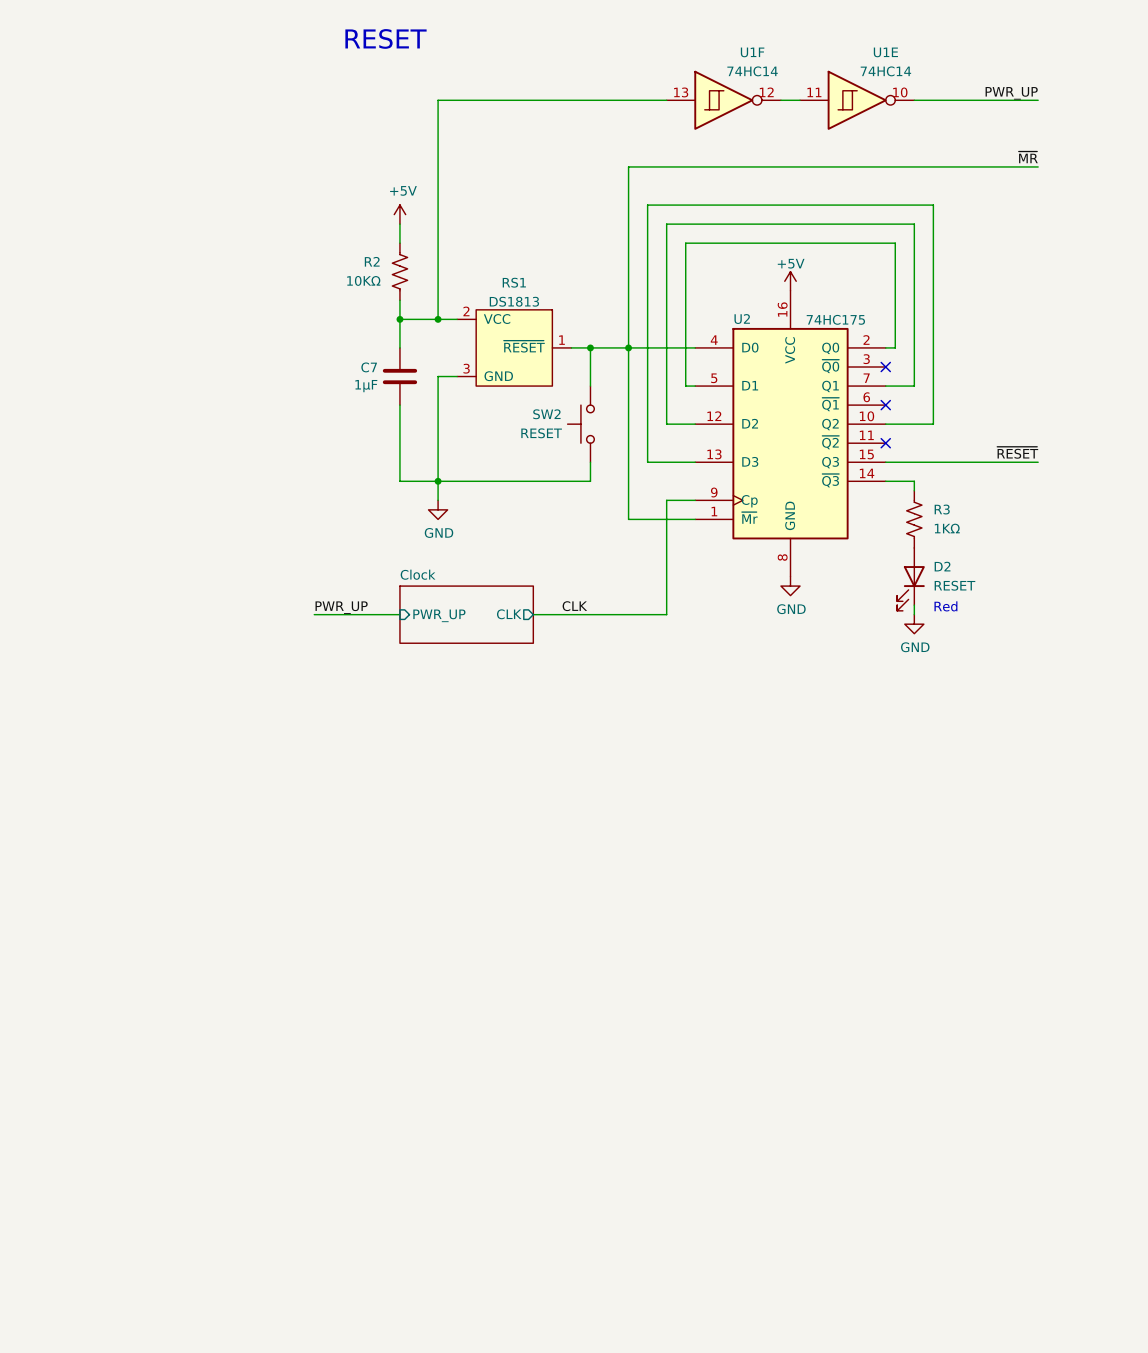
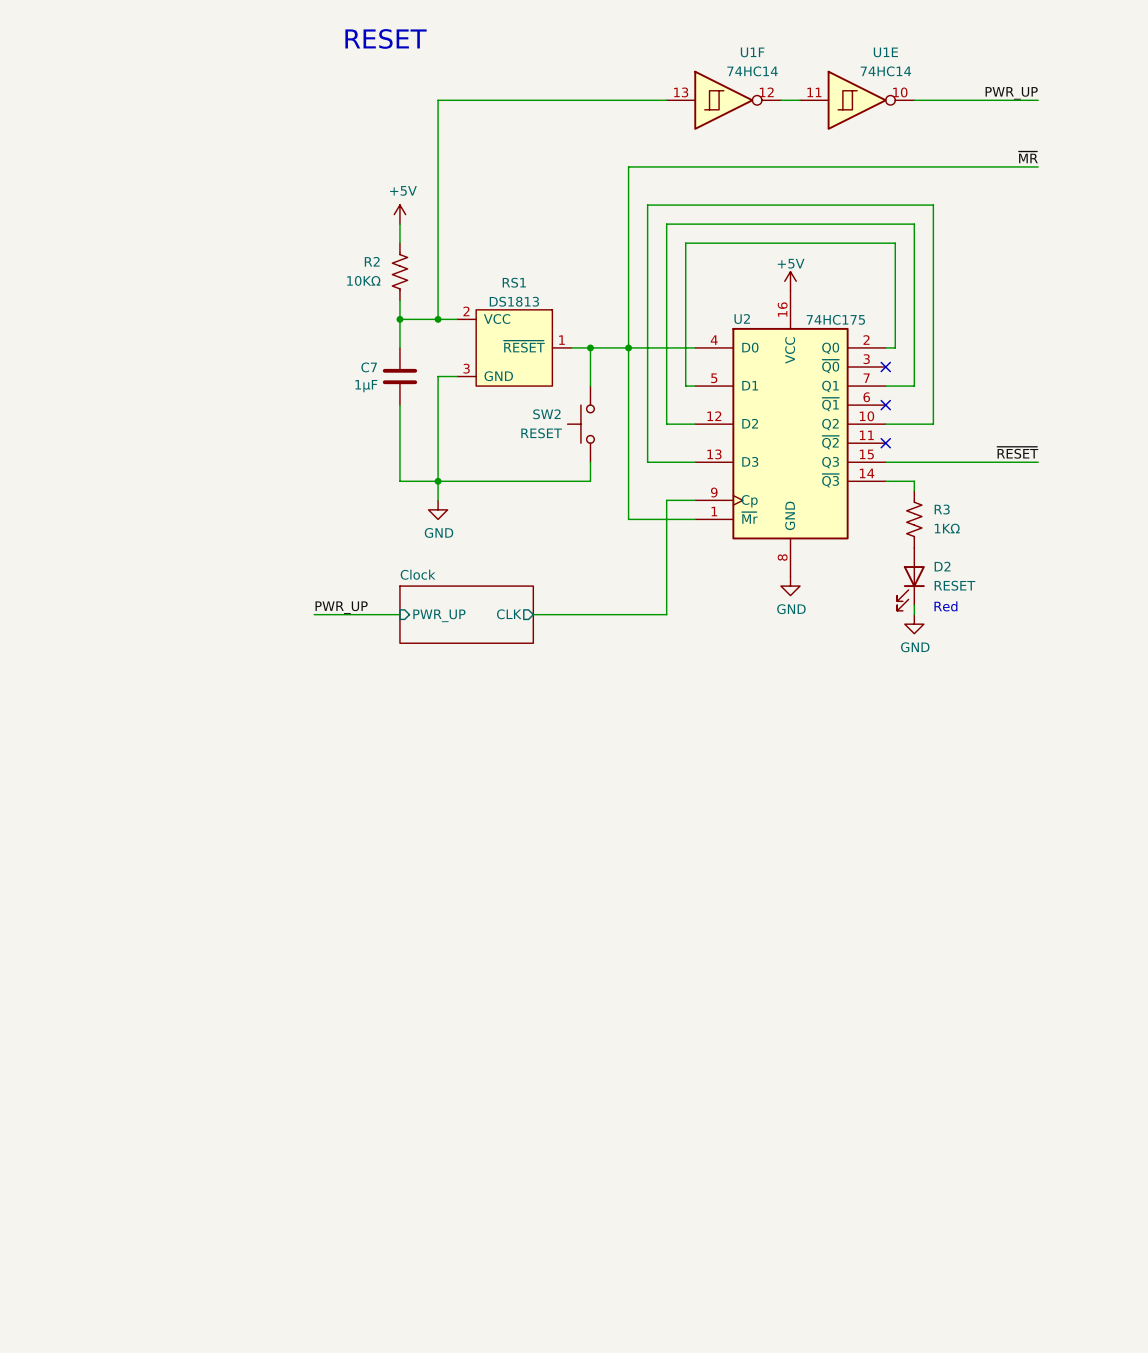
label: CLK (574, 606) -> none

